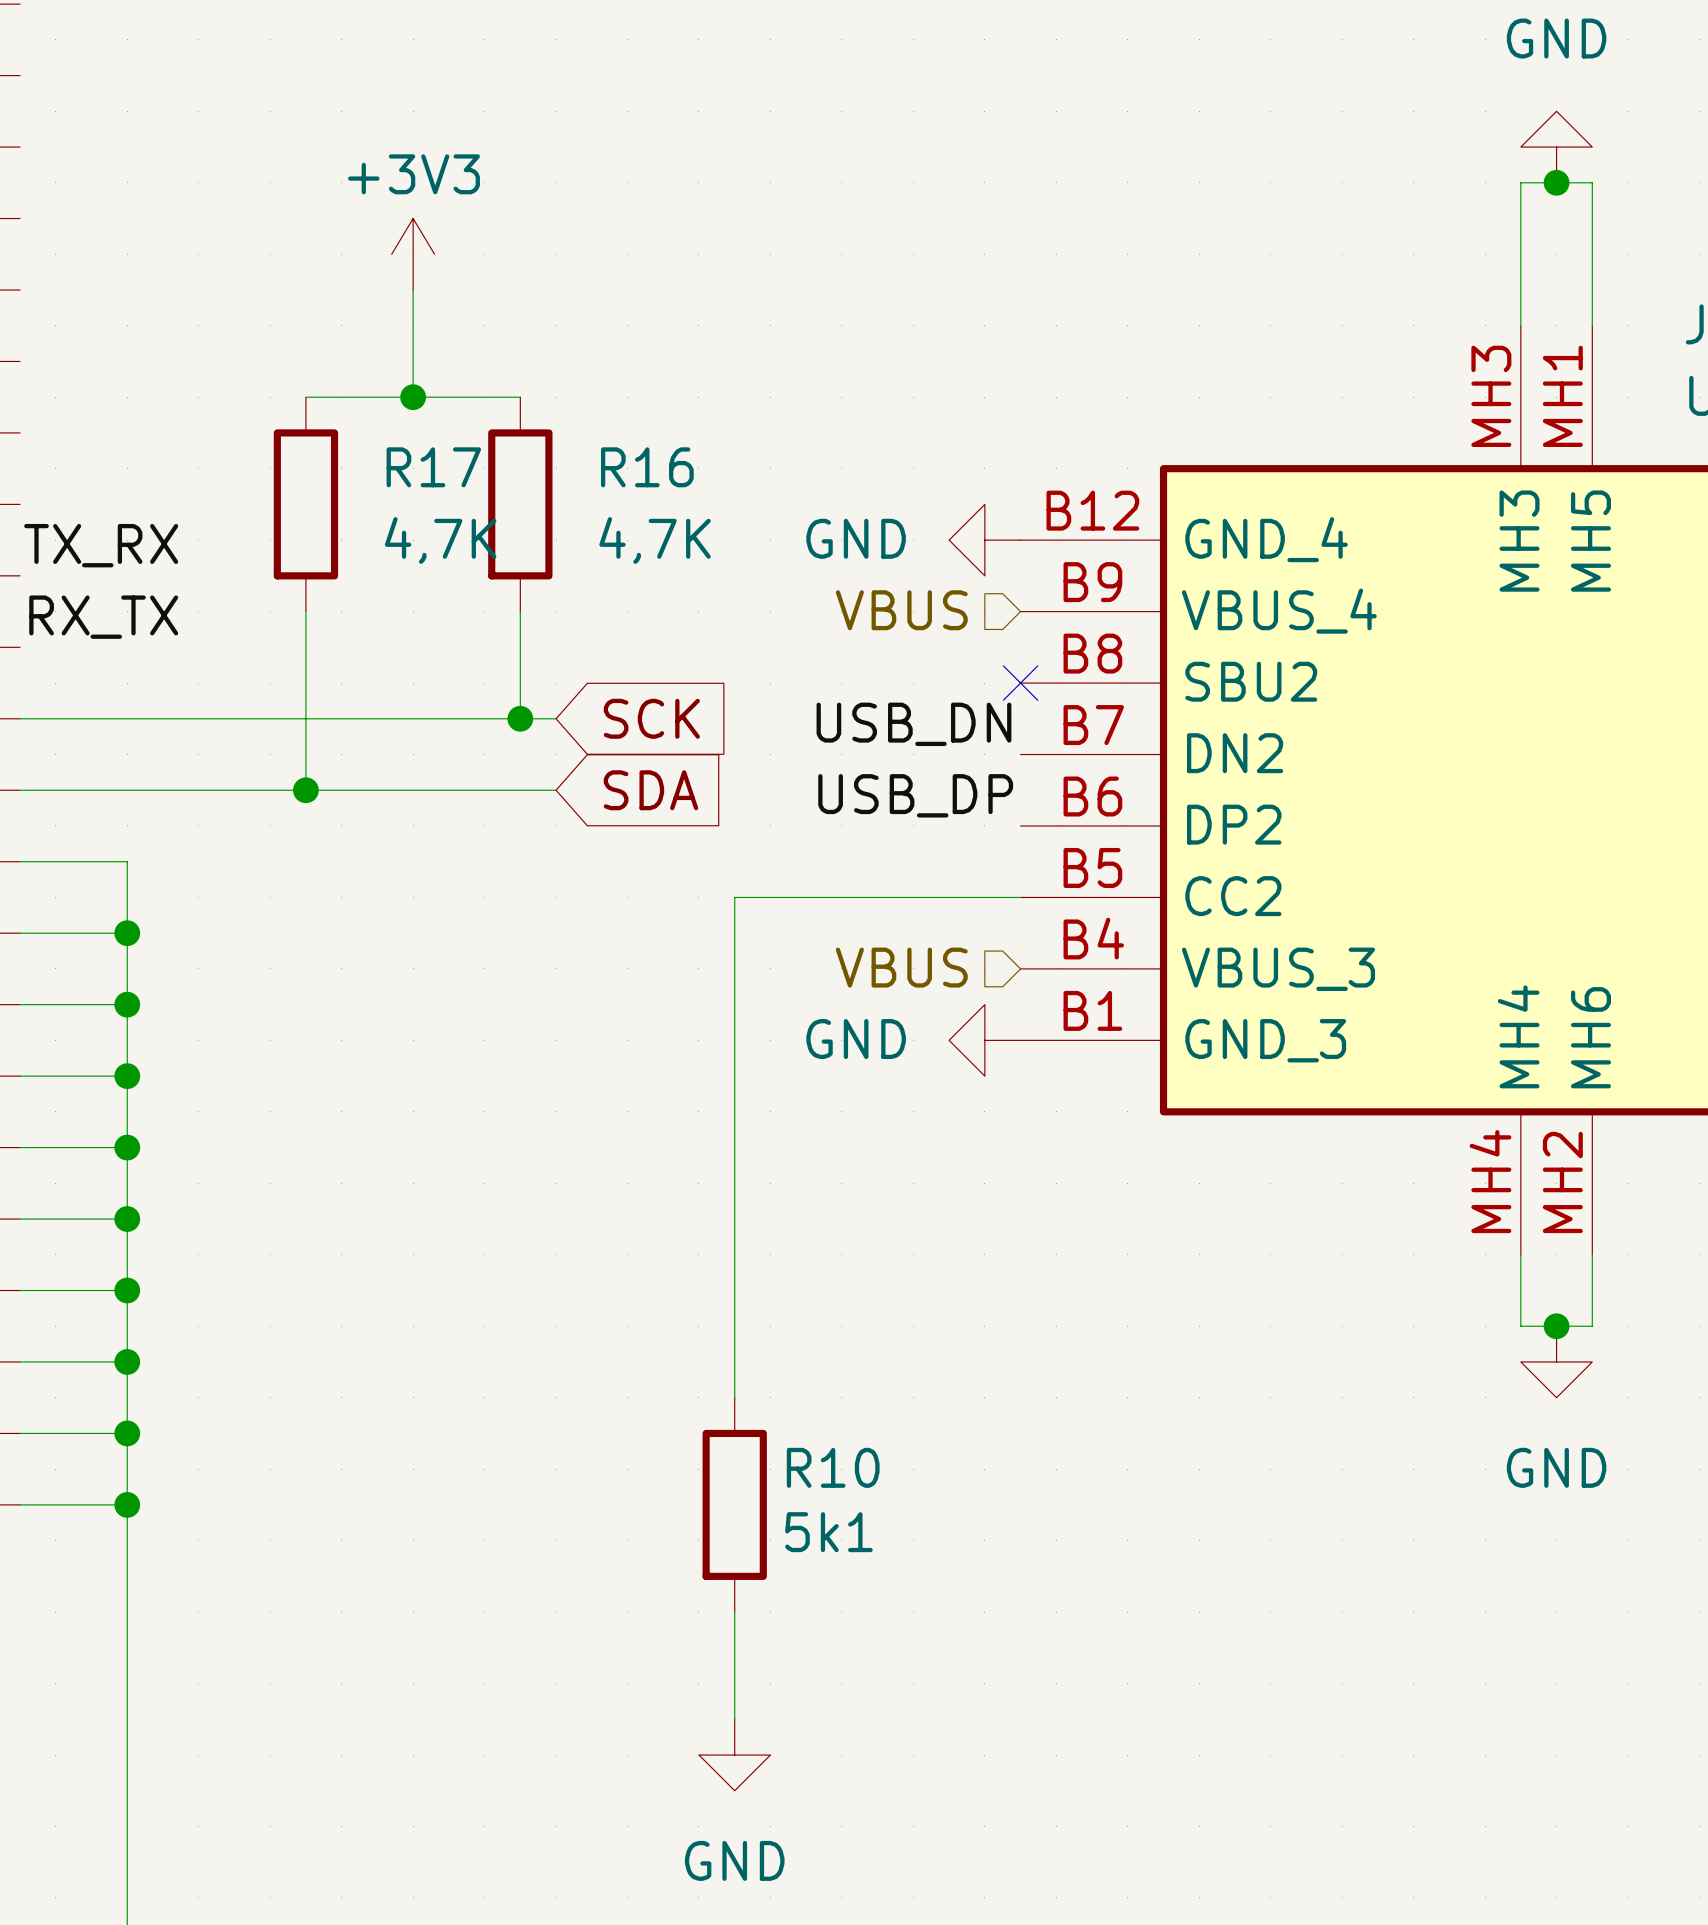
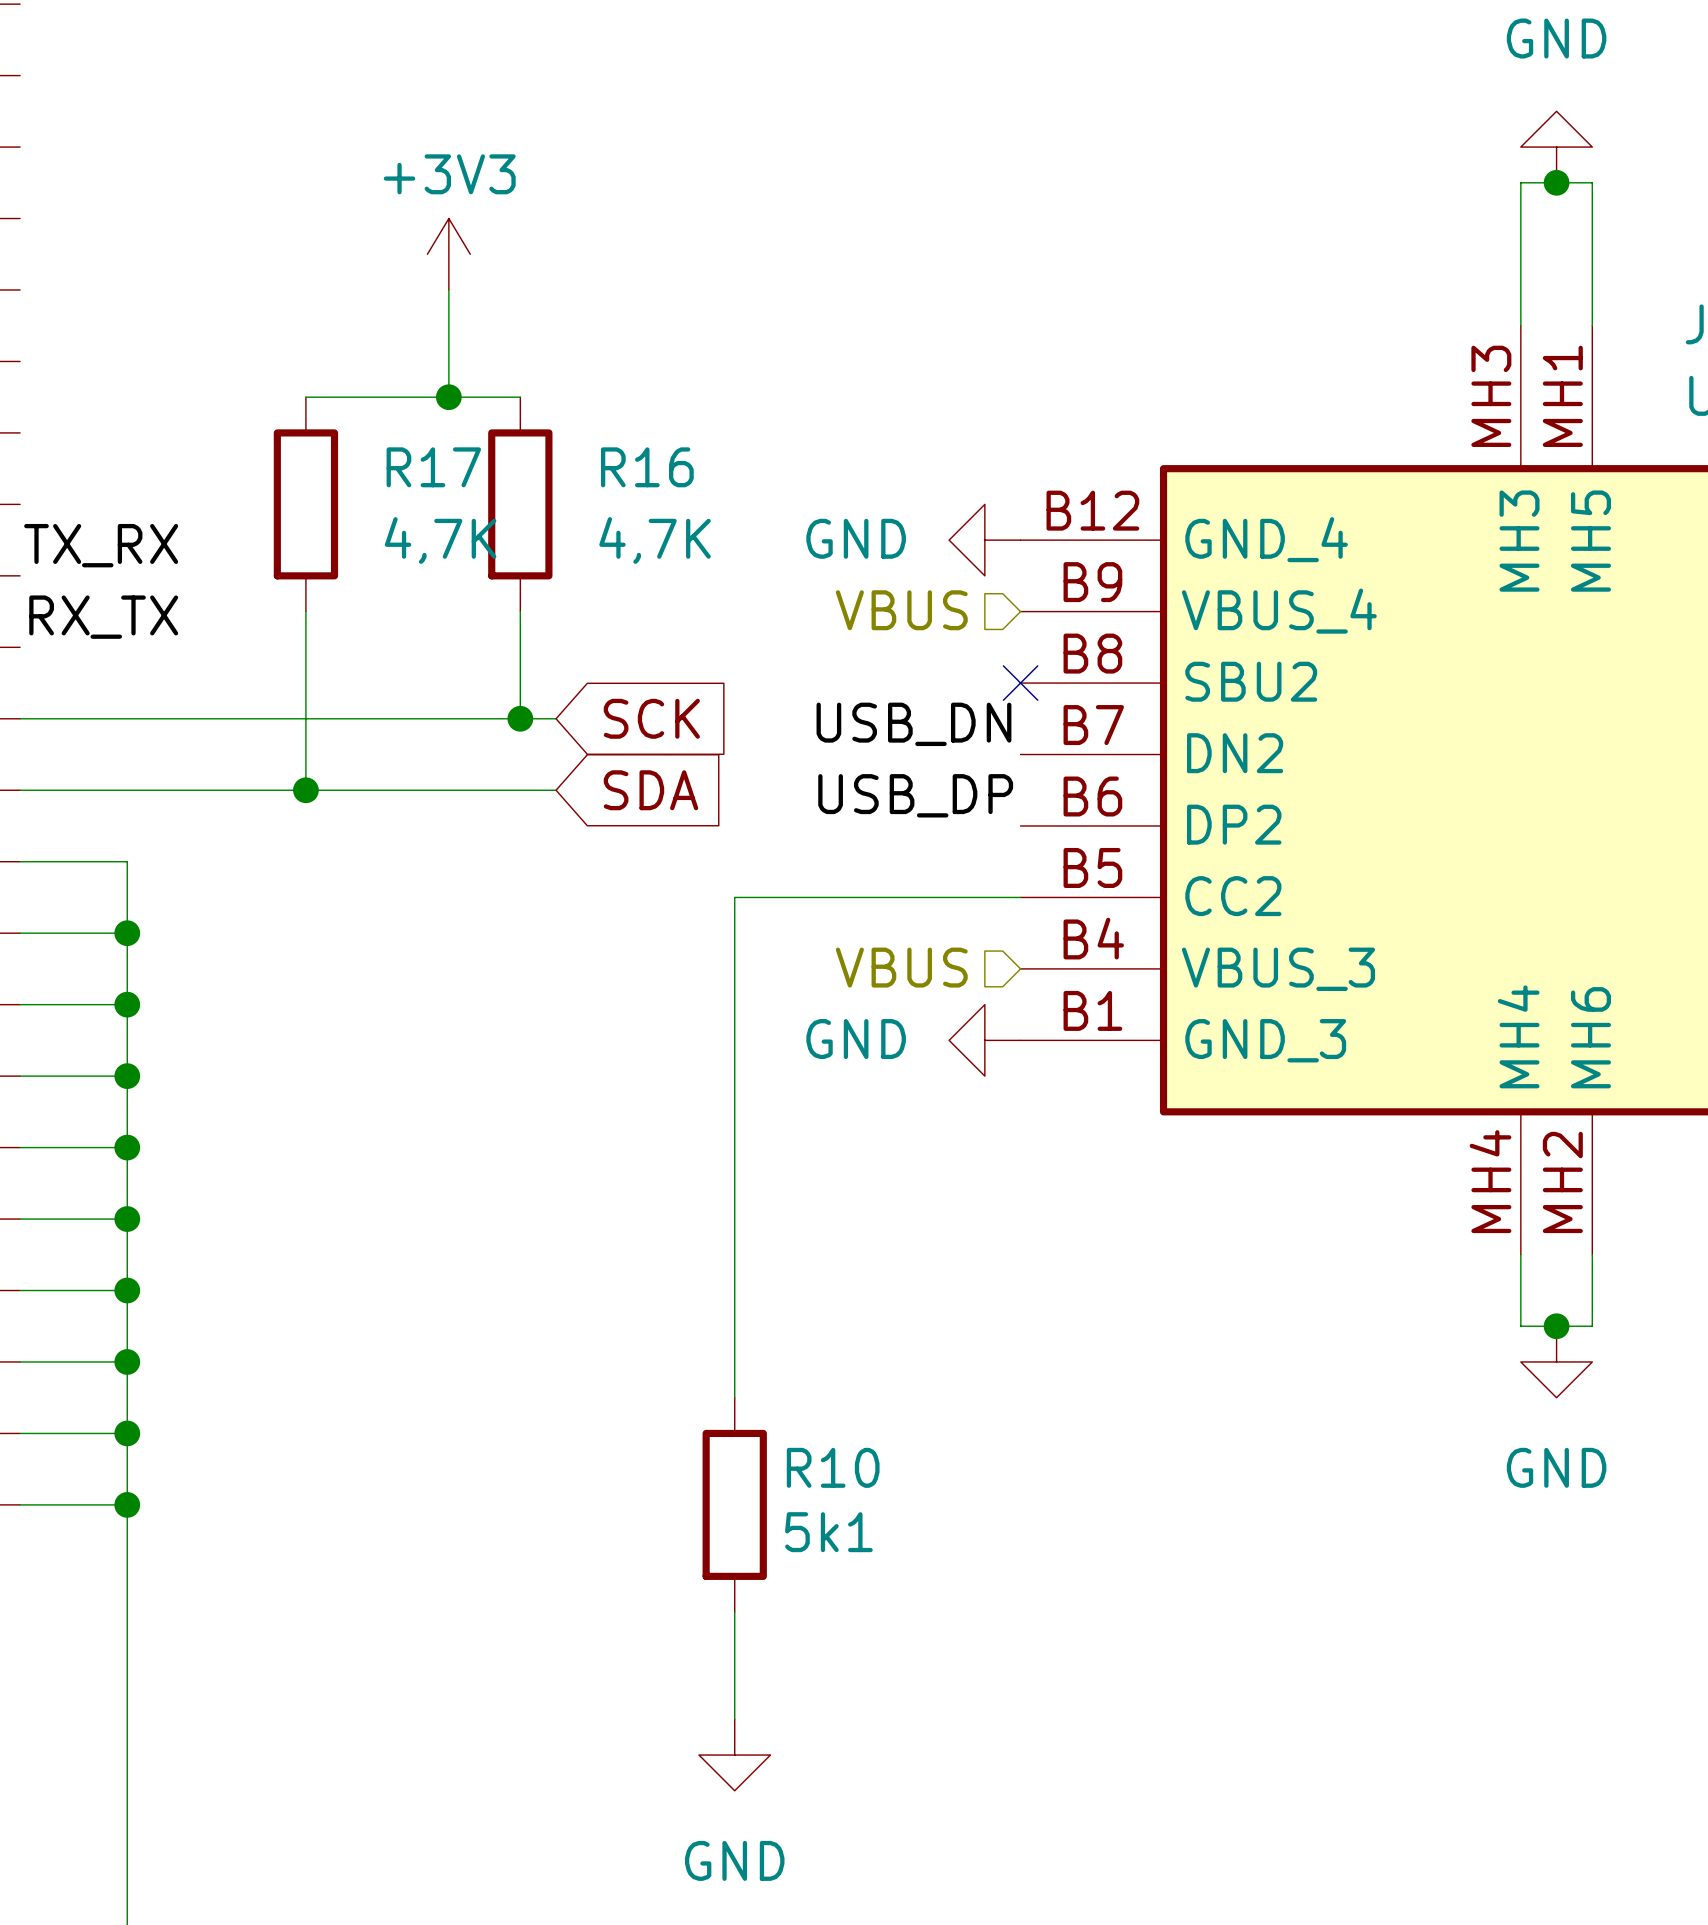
power symbol position: +3V3 (413, 254) -> +3V3 (448, 254)
wire: (413, 289) (413, 397) -> (448, 289) (448, 397)
junction position: (413, 397) -> (448, 397)

